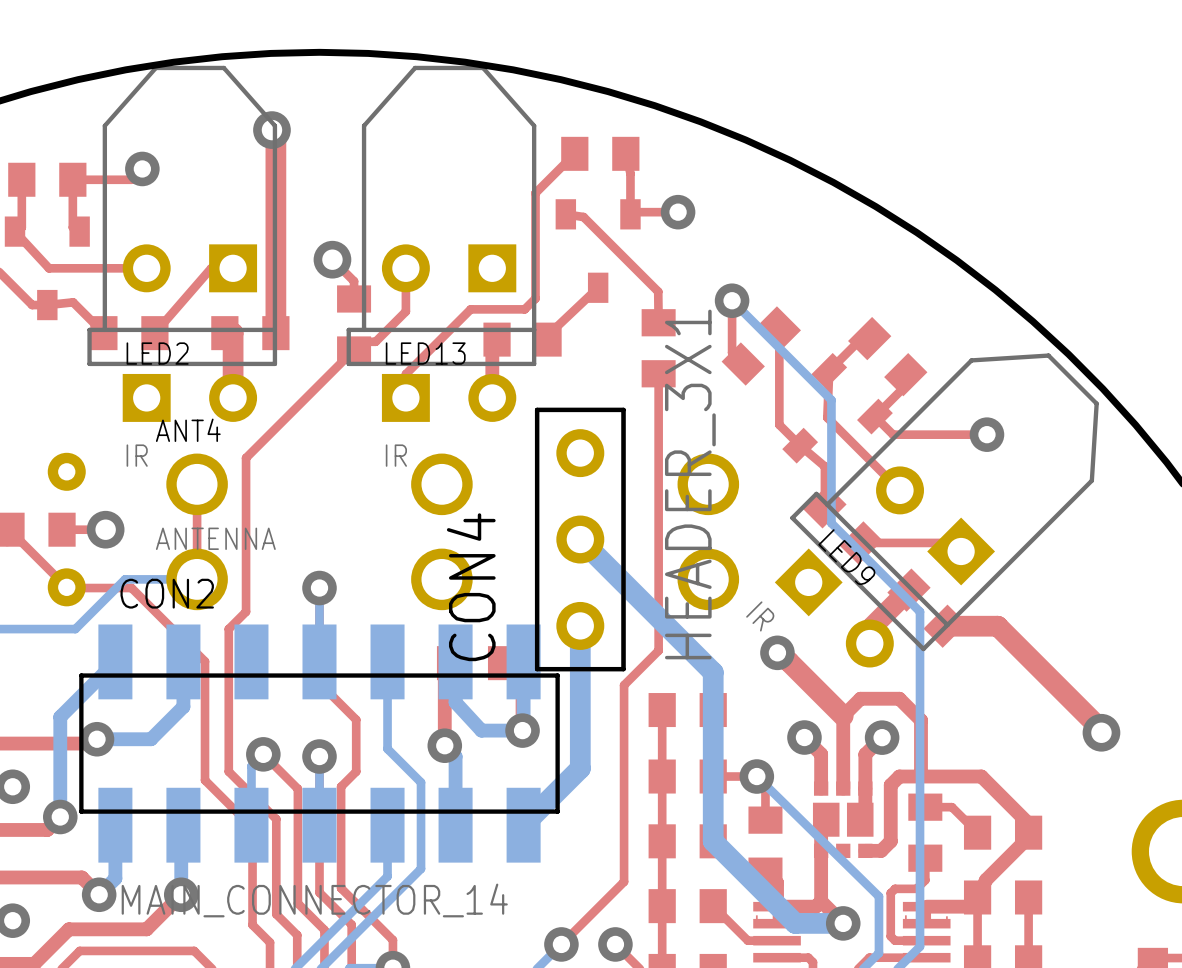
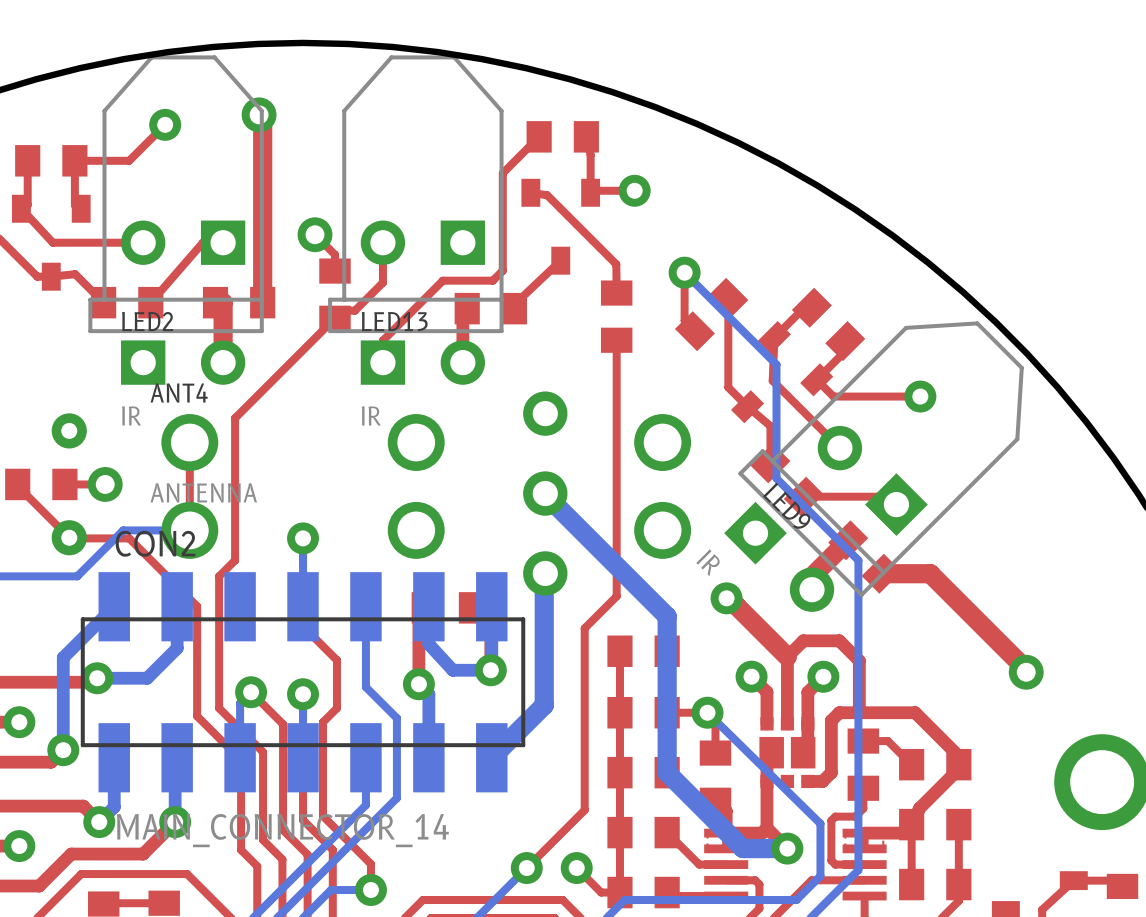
top track: none -> (165, 124) (139, 150)
via position: (142, 168) -> (165, 124)
CON4 side: bottom (580, 539) -> top (545, 493)

